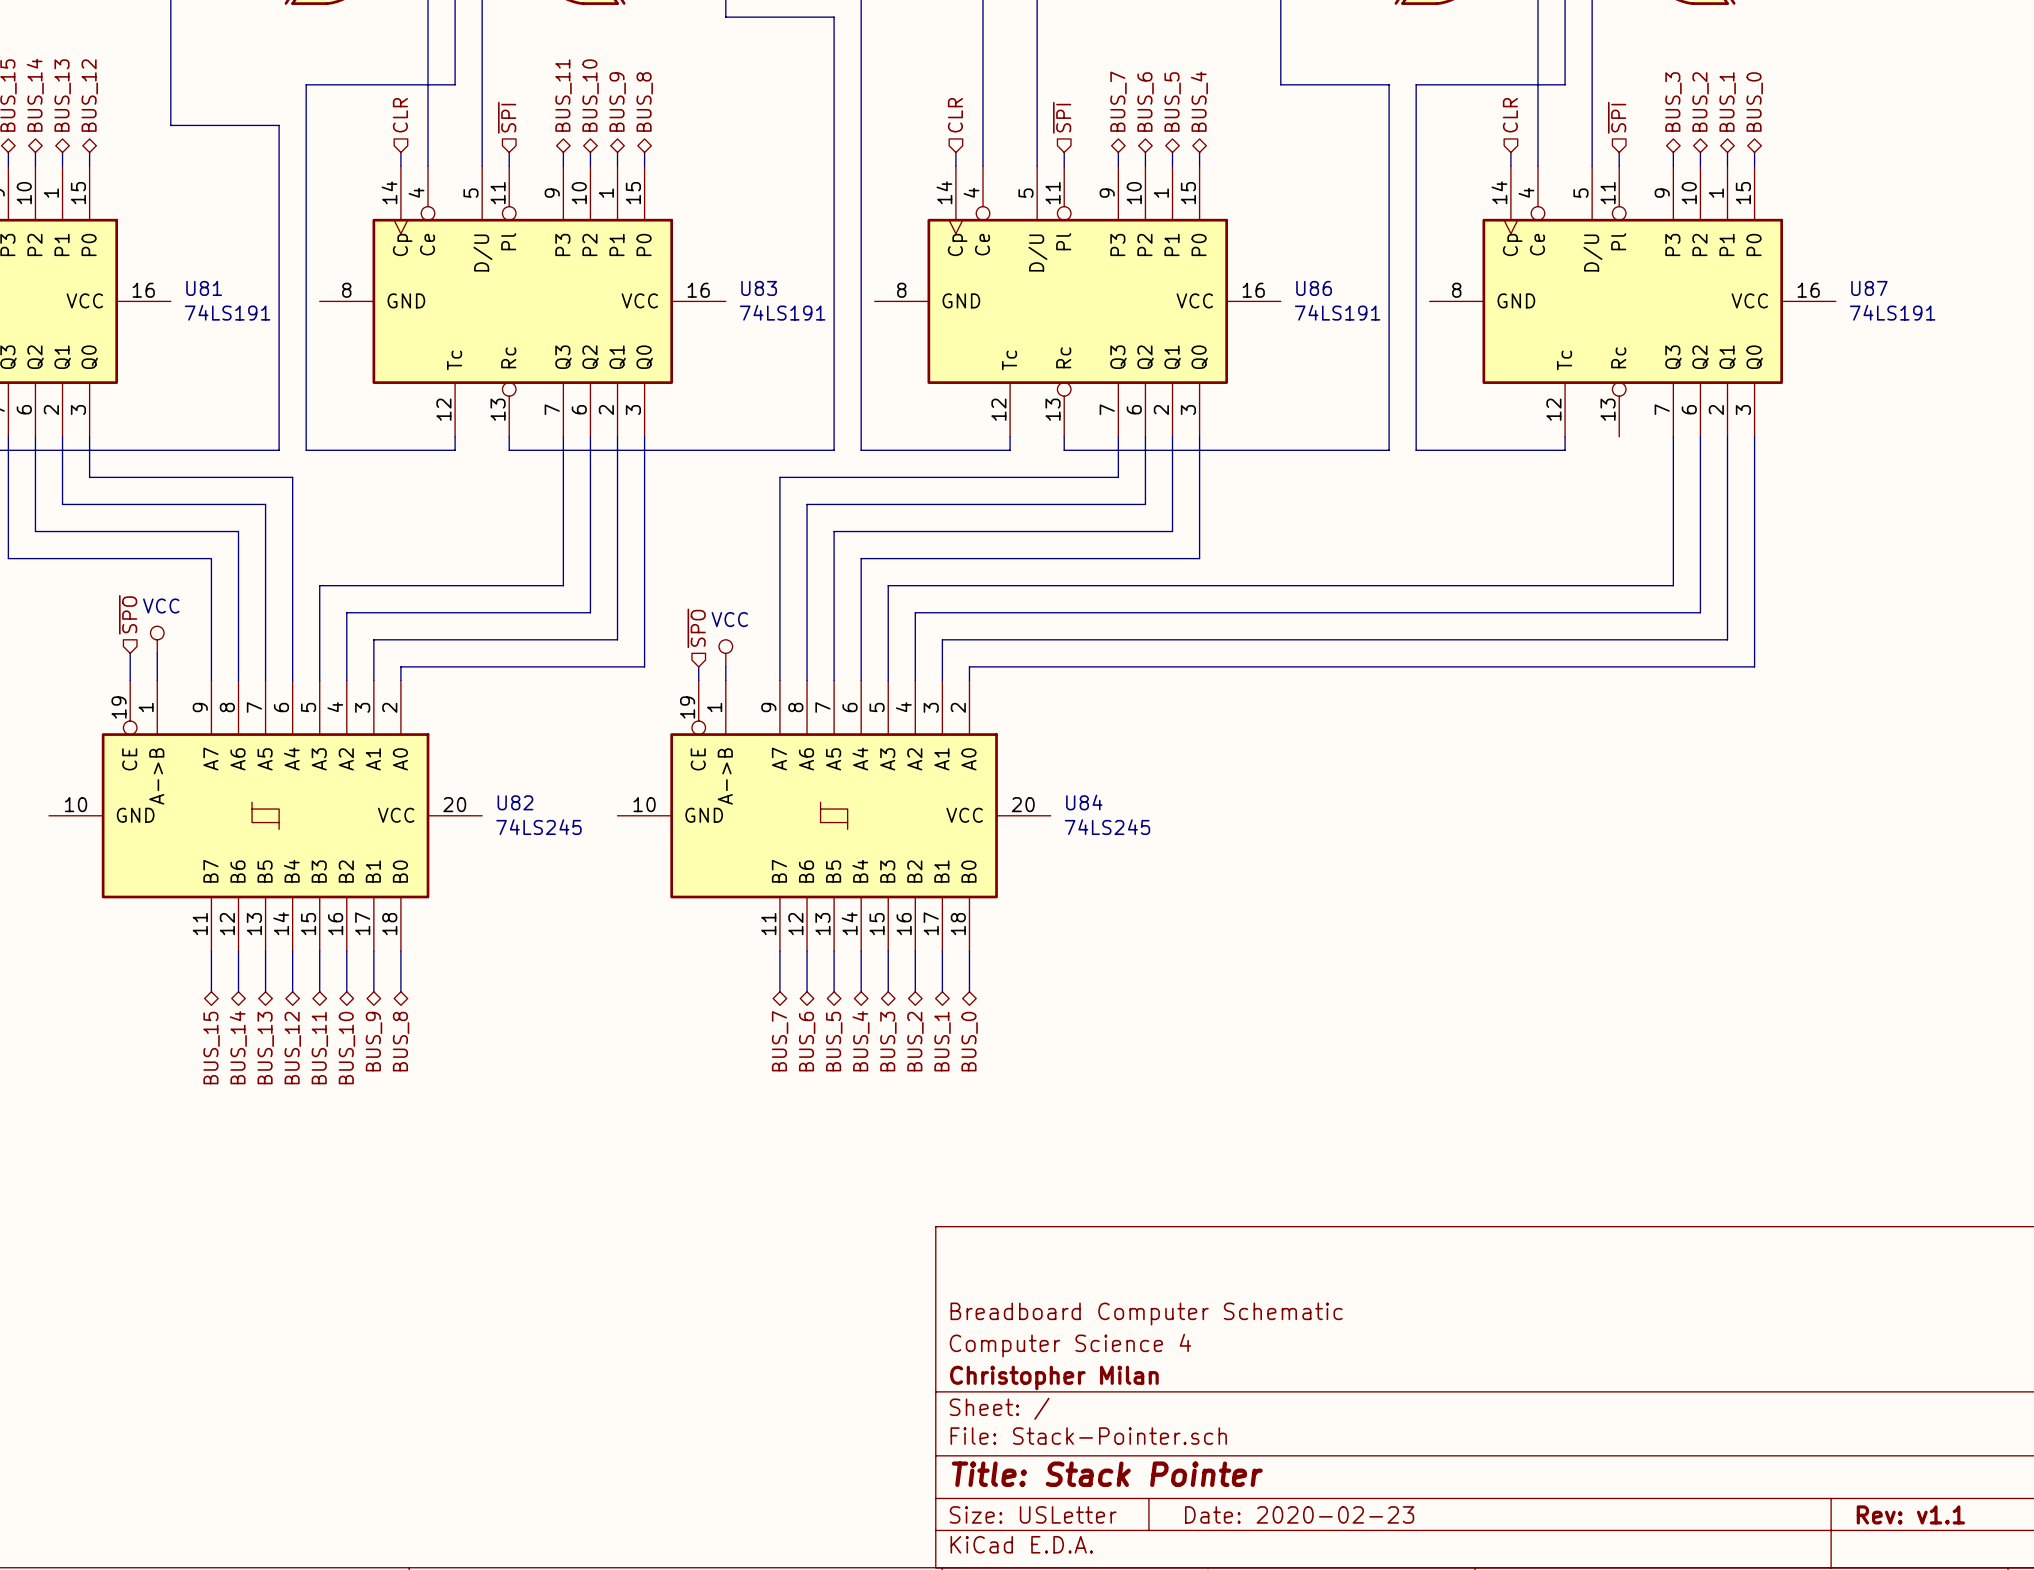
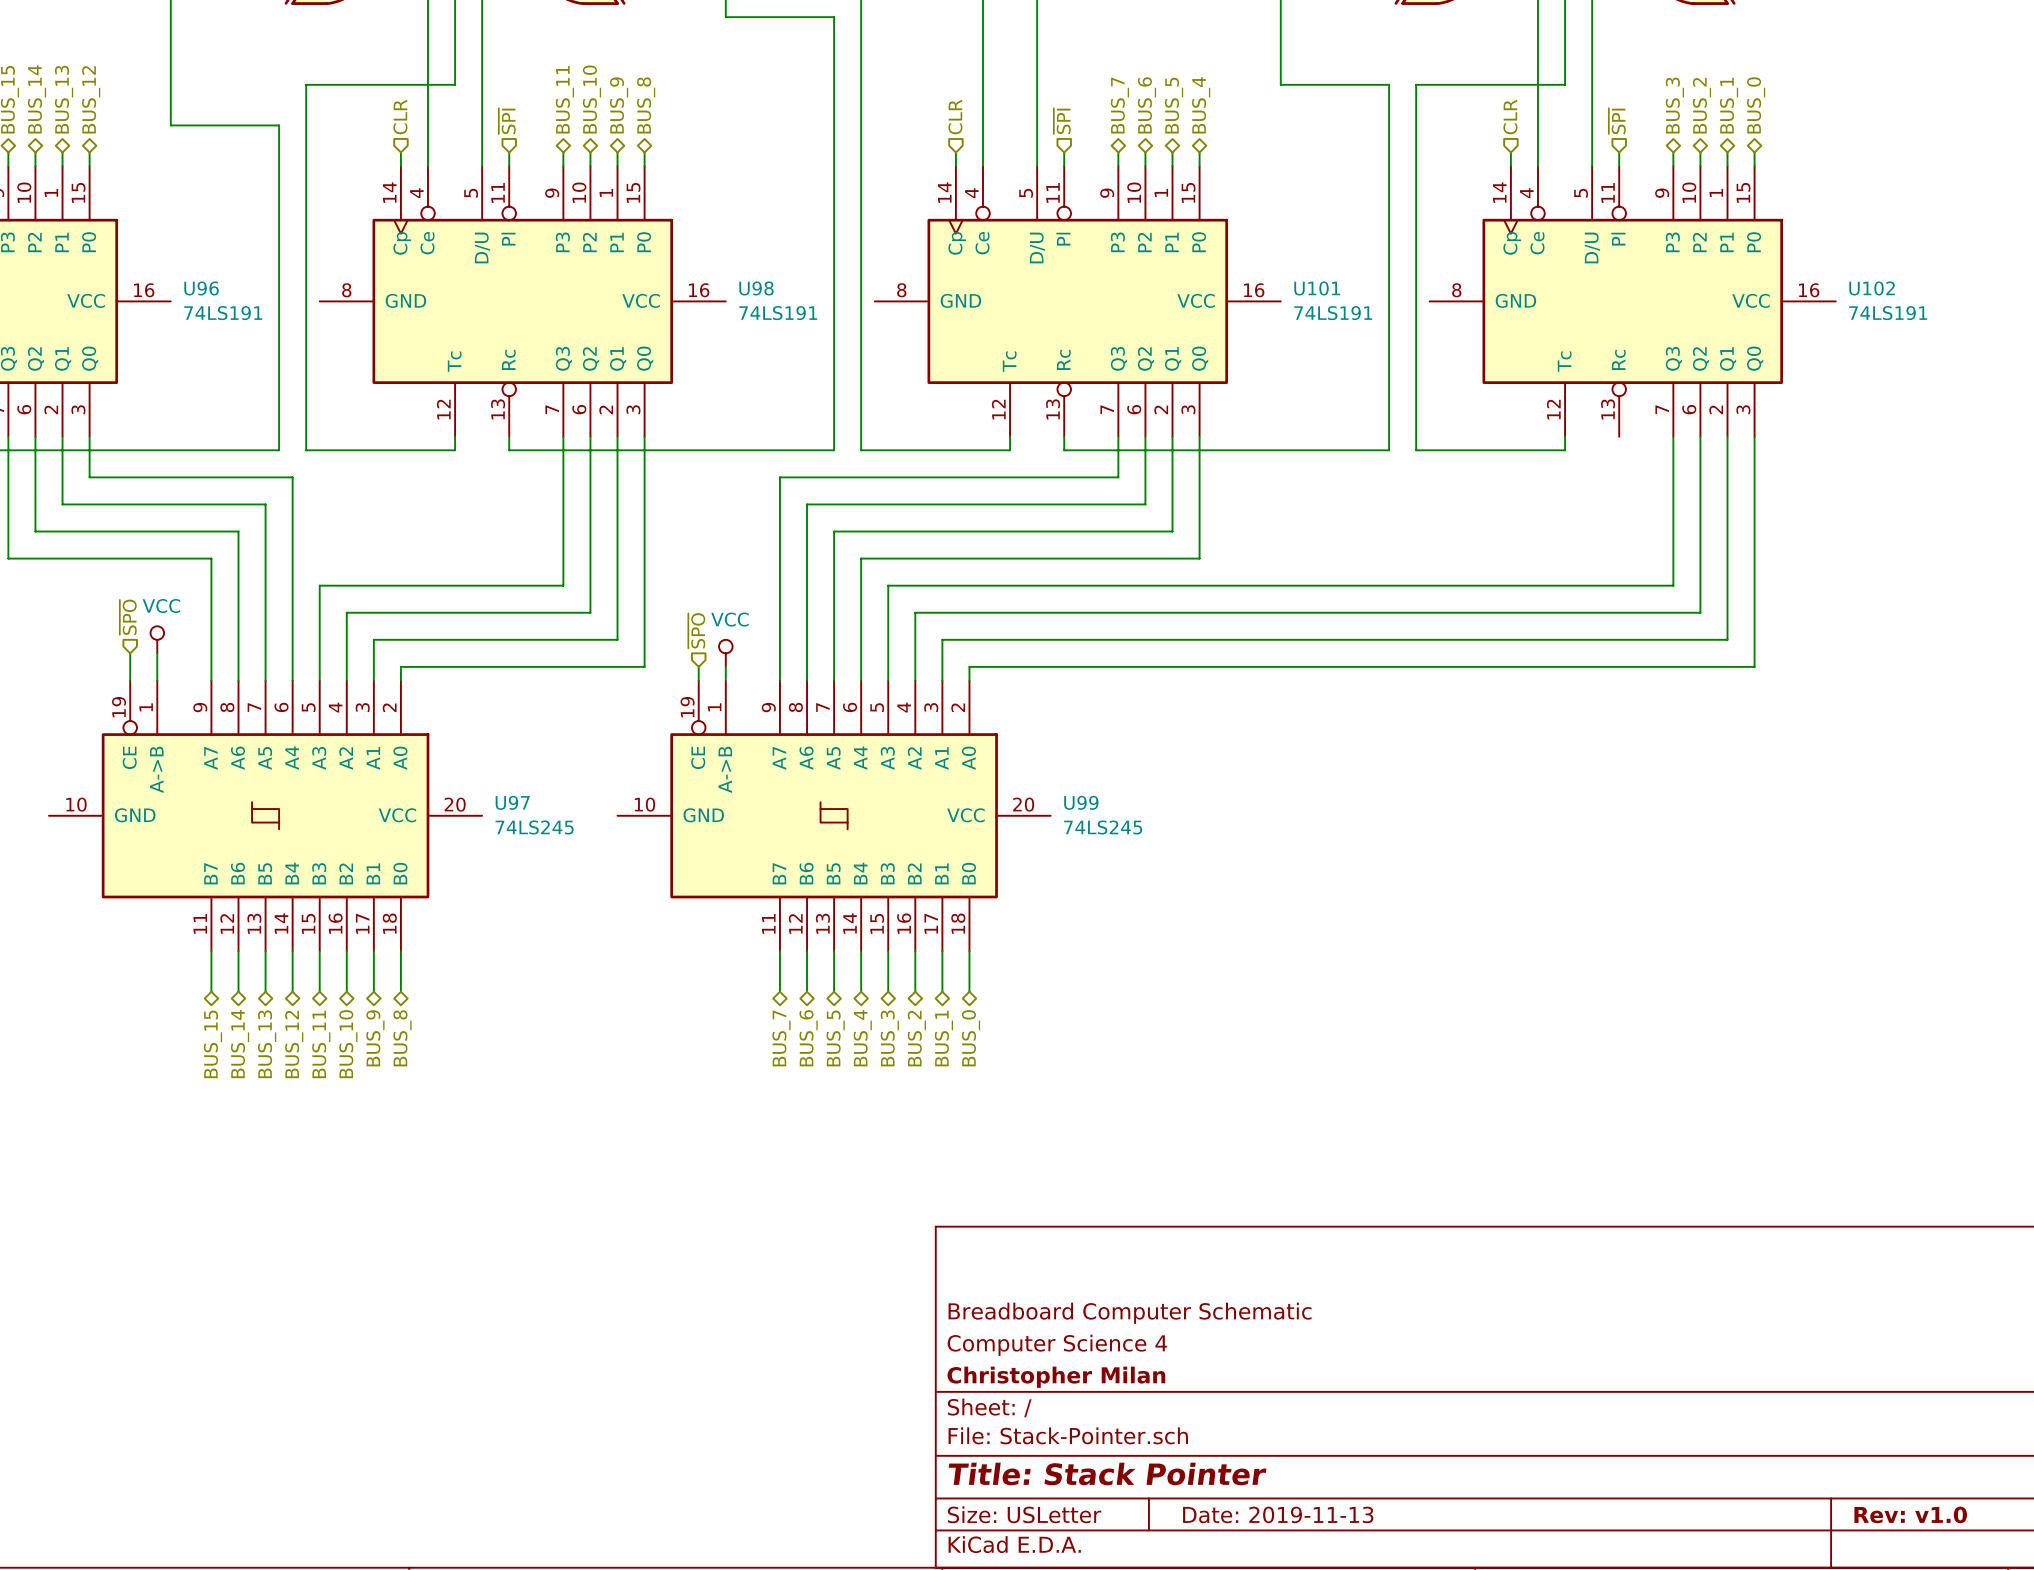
U81 name: U81 (204, 288) -> U96 (201, 288)
U83 name: U83 (759, 288) -> U98 (756, 288)
U86 name: U86 (1314, 288) -> U101 (1317, 288)
U87 name: U87 (1869, 288) -> U102 (1872, 288)
U82 name: U82 (515, 802) -> U97 (512, 802)
U84 name: U84 (1084, 802) -> U99 (1081, 802)
title block: Date: 2020-02-23 (1299, 1514) -> Date: 2019-11-13 (1278, 1514)
title block: Rev: v1.1 (1910, 1514) -> Rev: v1.0 (1910, 1514)

